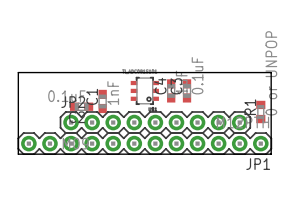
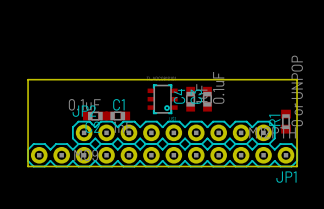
C1 rotation: 0° (102, 101) -> 90° clockwise (117, 116)

